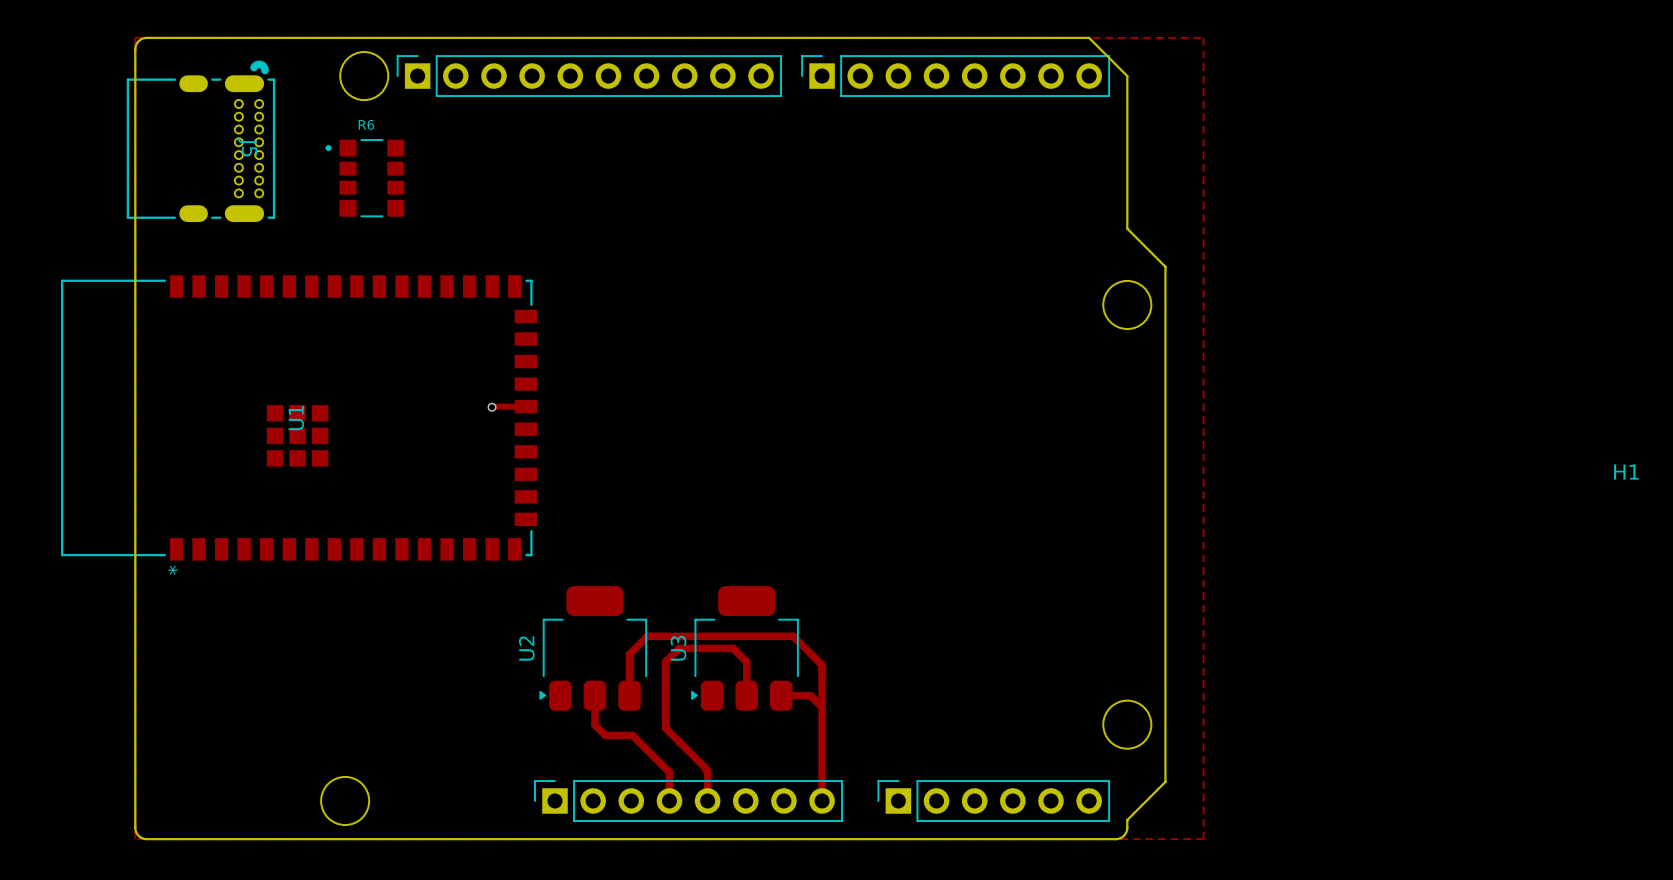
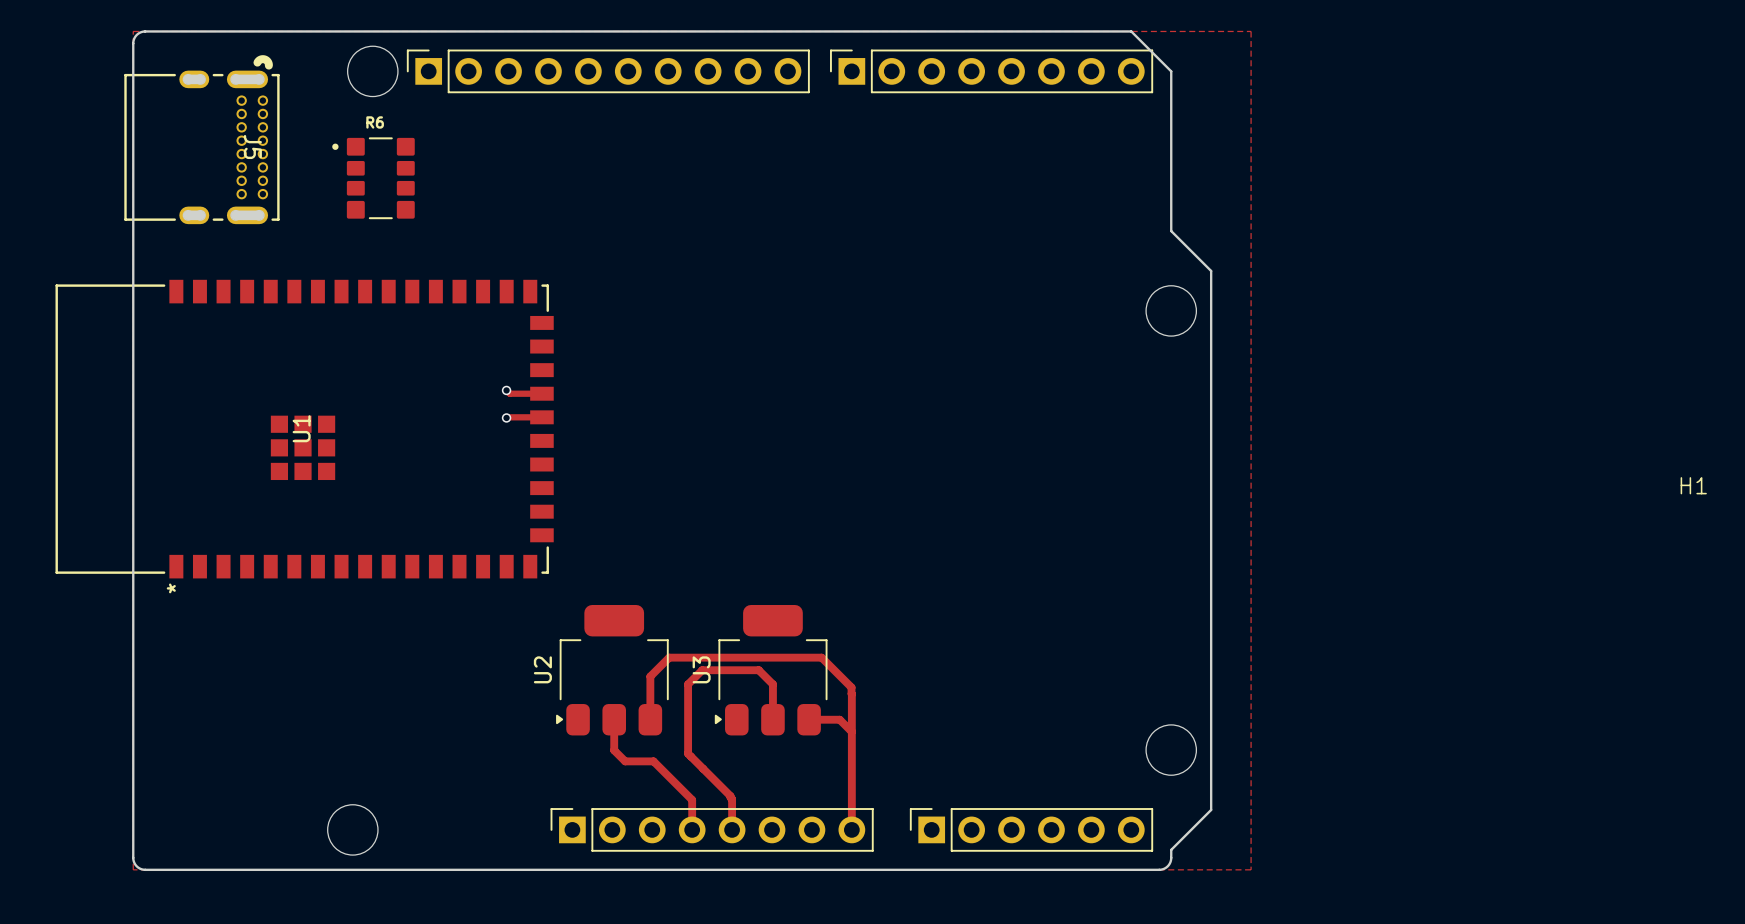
track: none -> (506, 390) (509, 393) (541, 393)
via: none -> (506, 390)

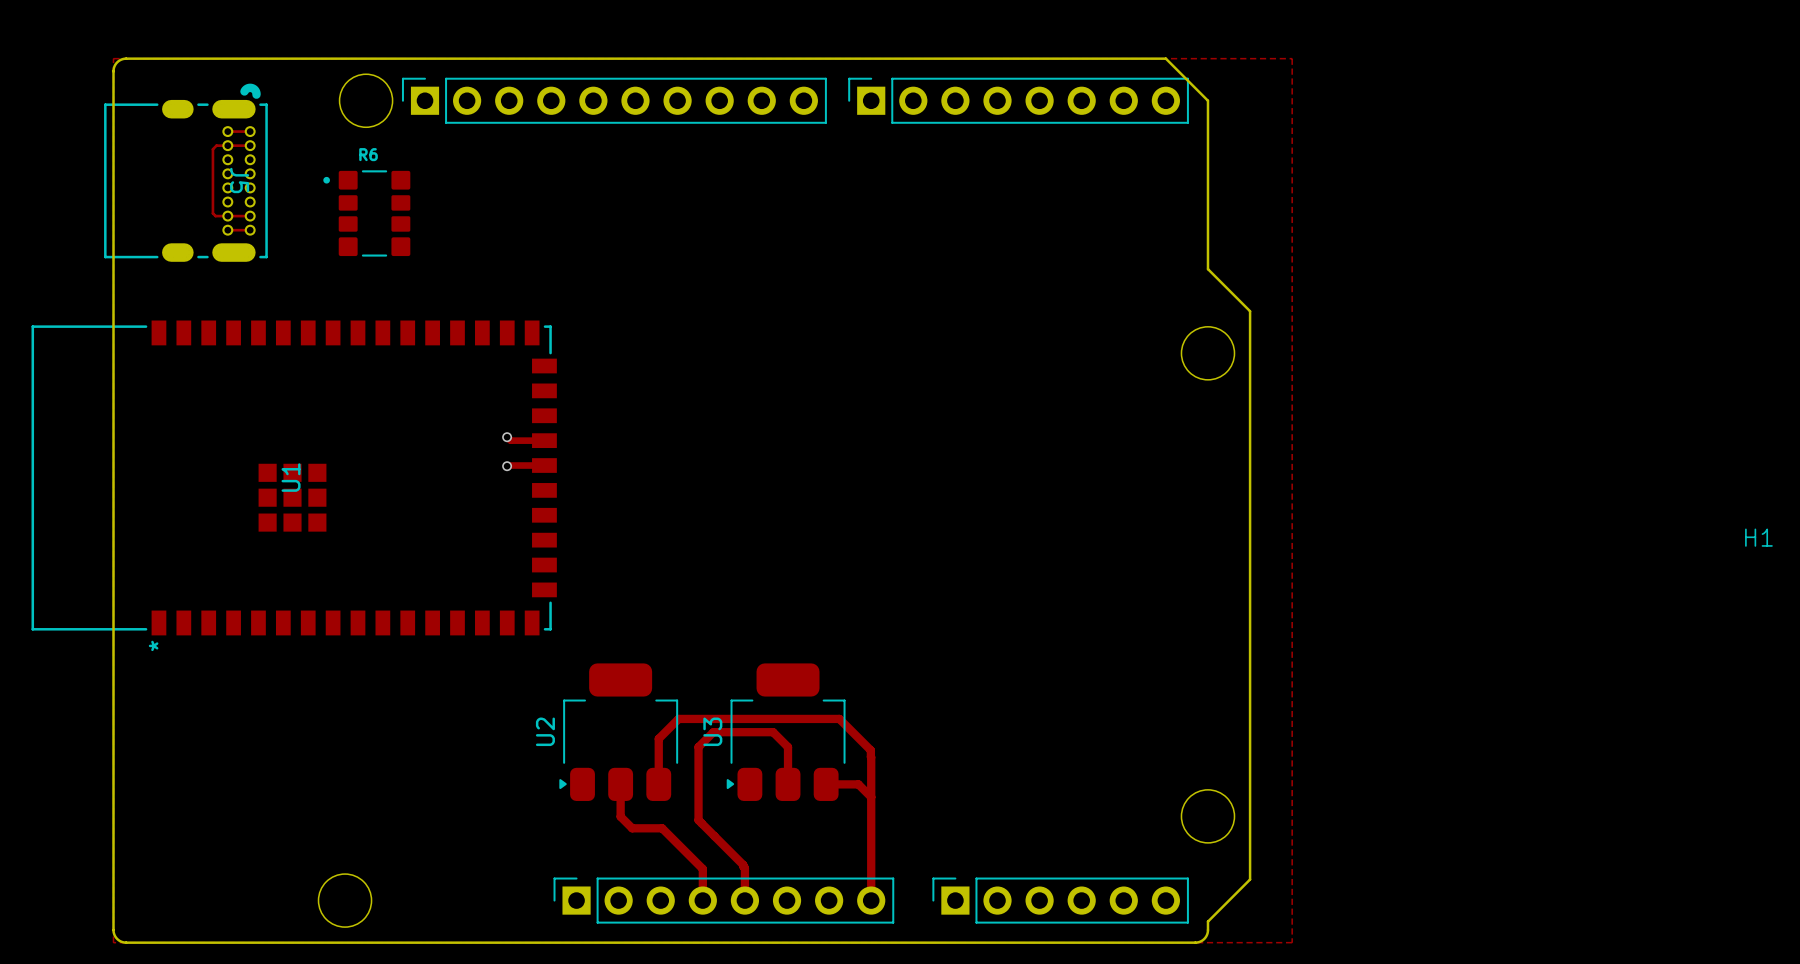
track: none -> (227, 131) (250, 131)
track: none -> (250, 145) (216, 145) (212, 149) (212, 213) (215, 216) (250, 216)
track: none -> (227, 230) (250, 230)

